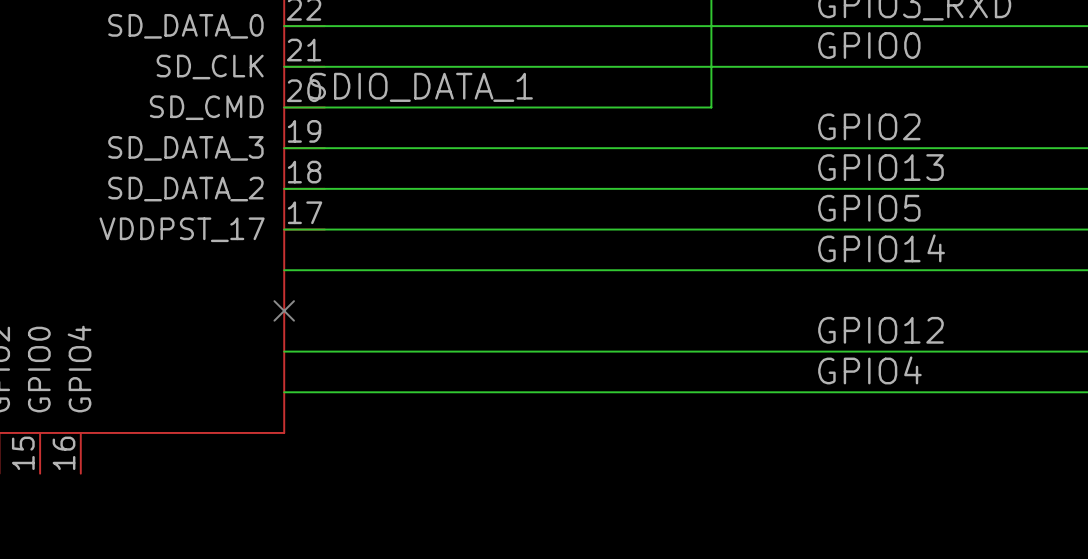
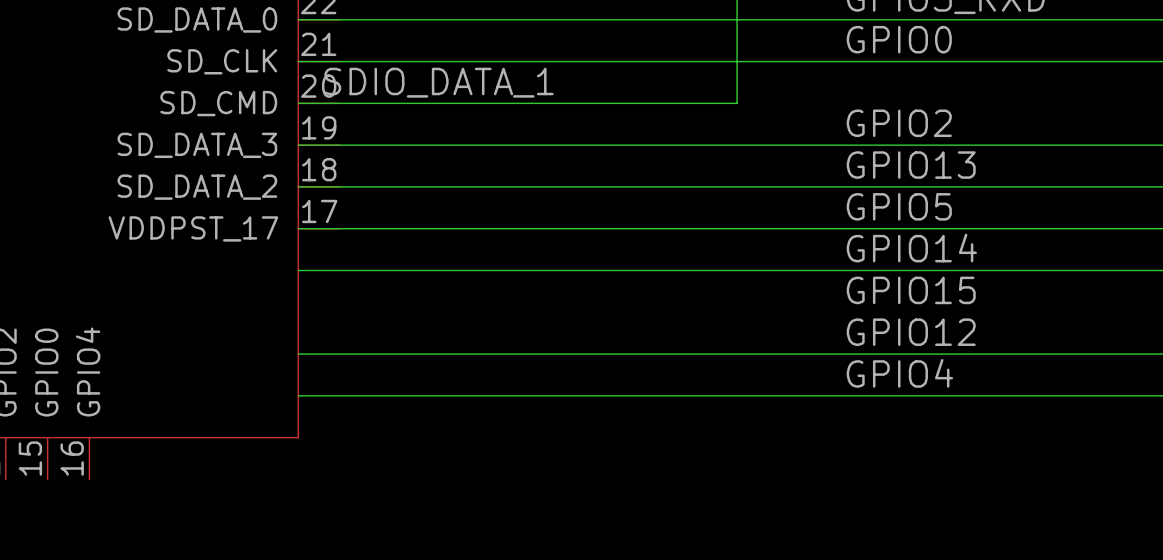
label: none -> GPIO15 (911, 290)
no-connect mark: (284, 310) -> none

